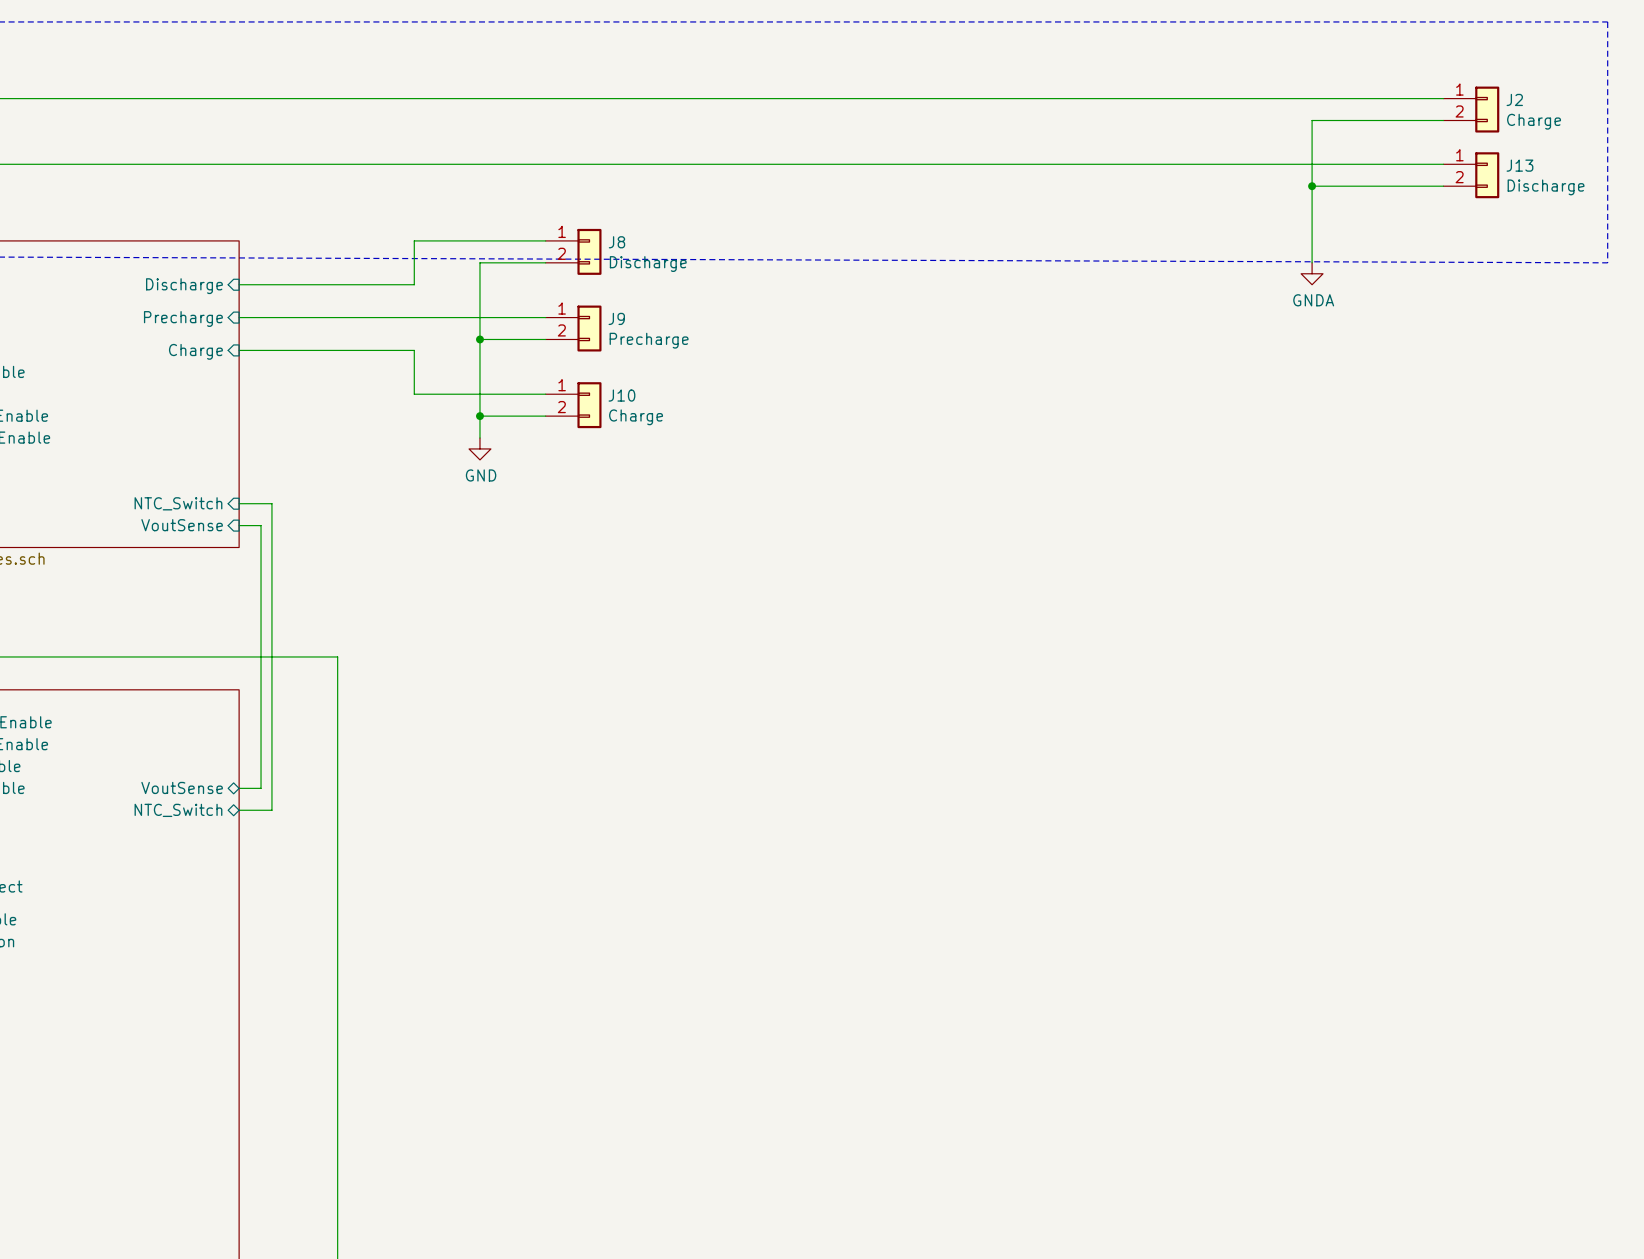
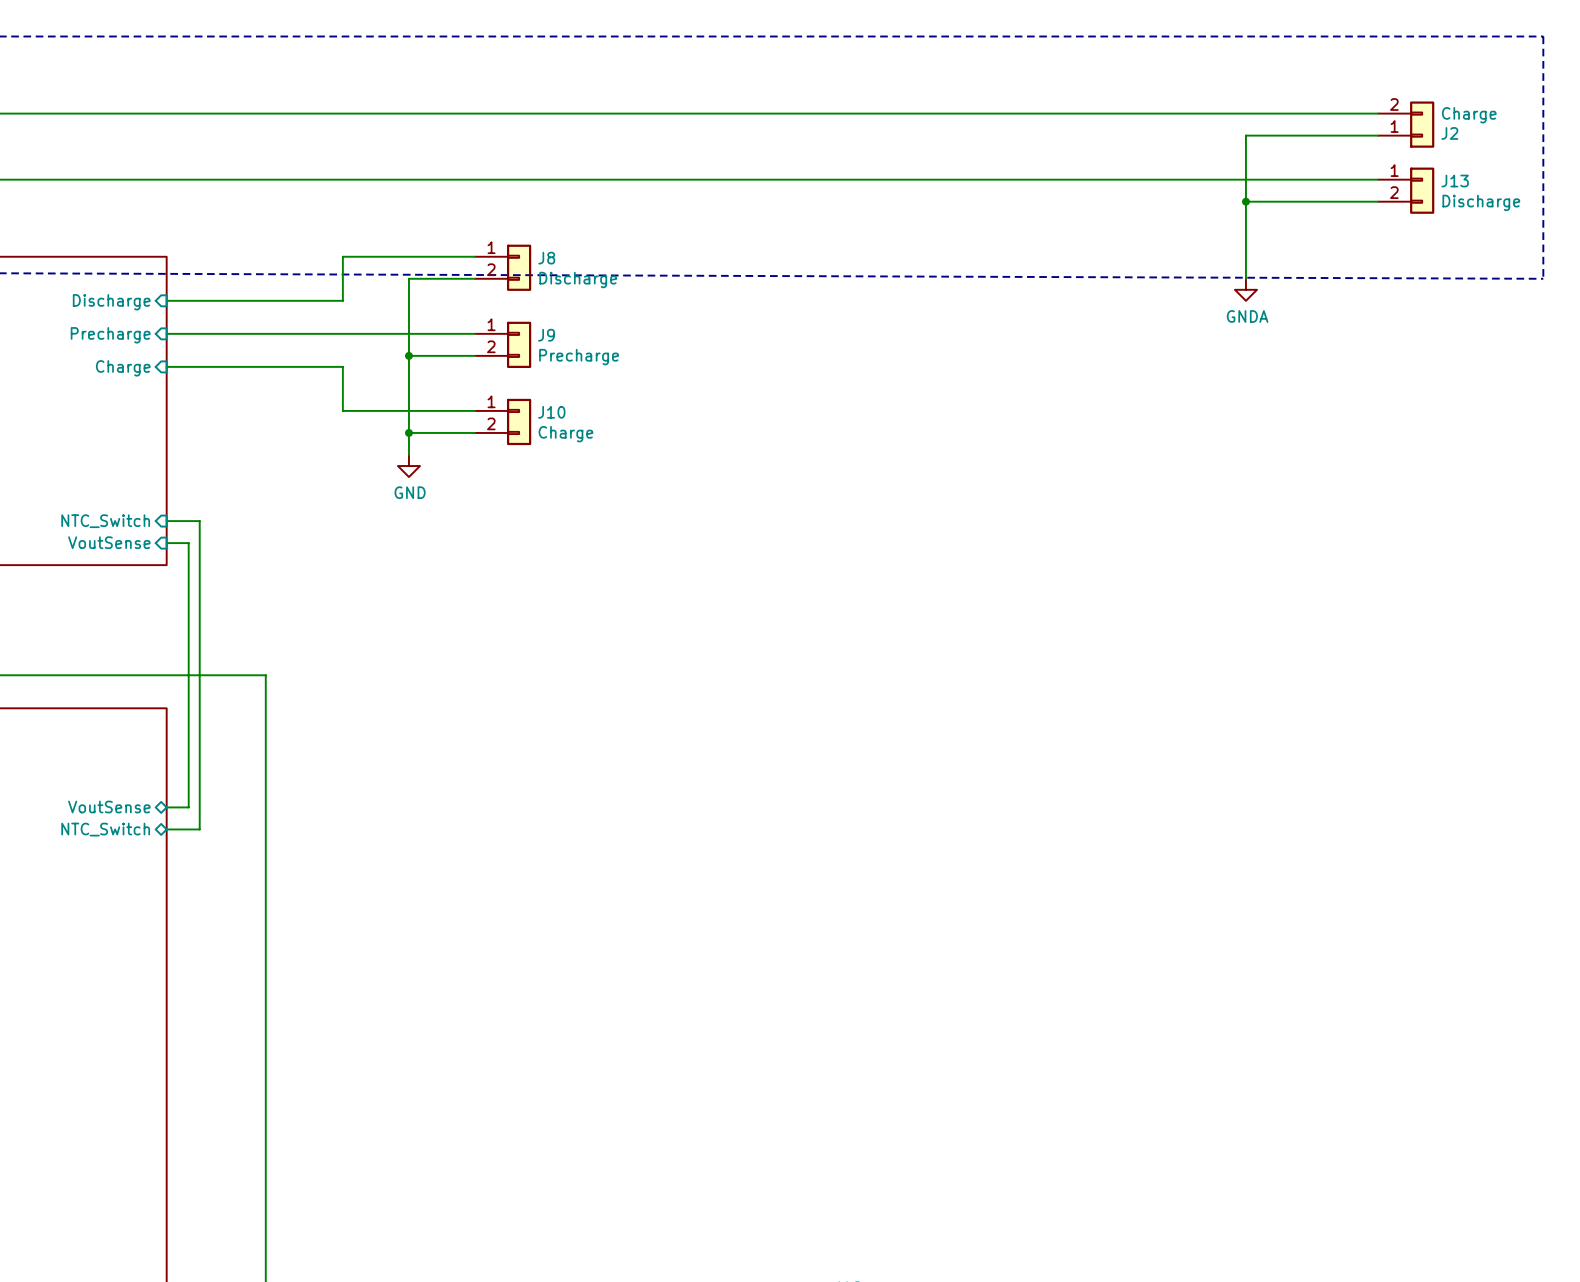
J2 flip: as is (1487, 109) -> up-down (1422, 124)

